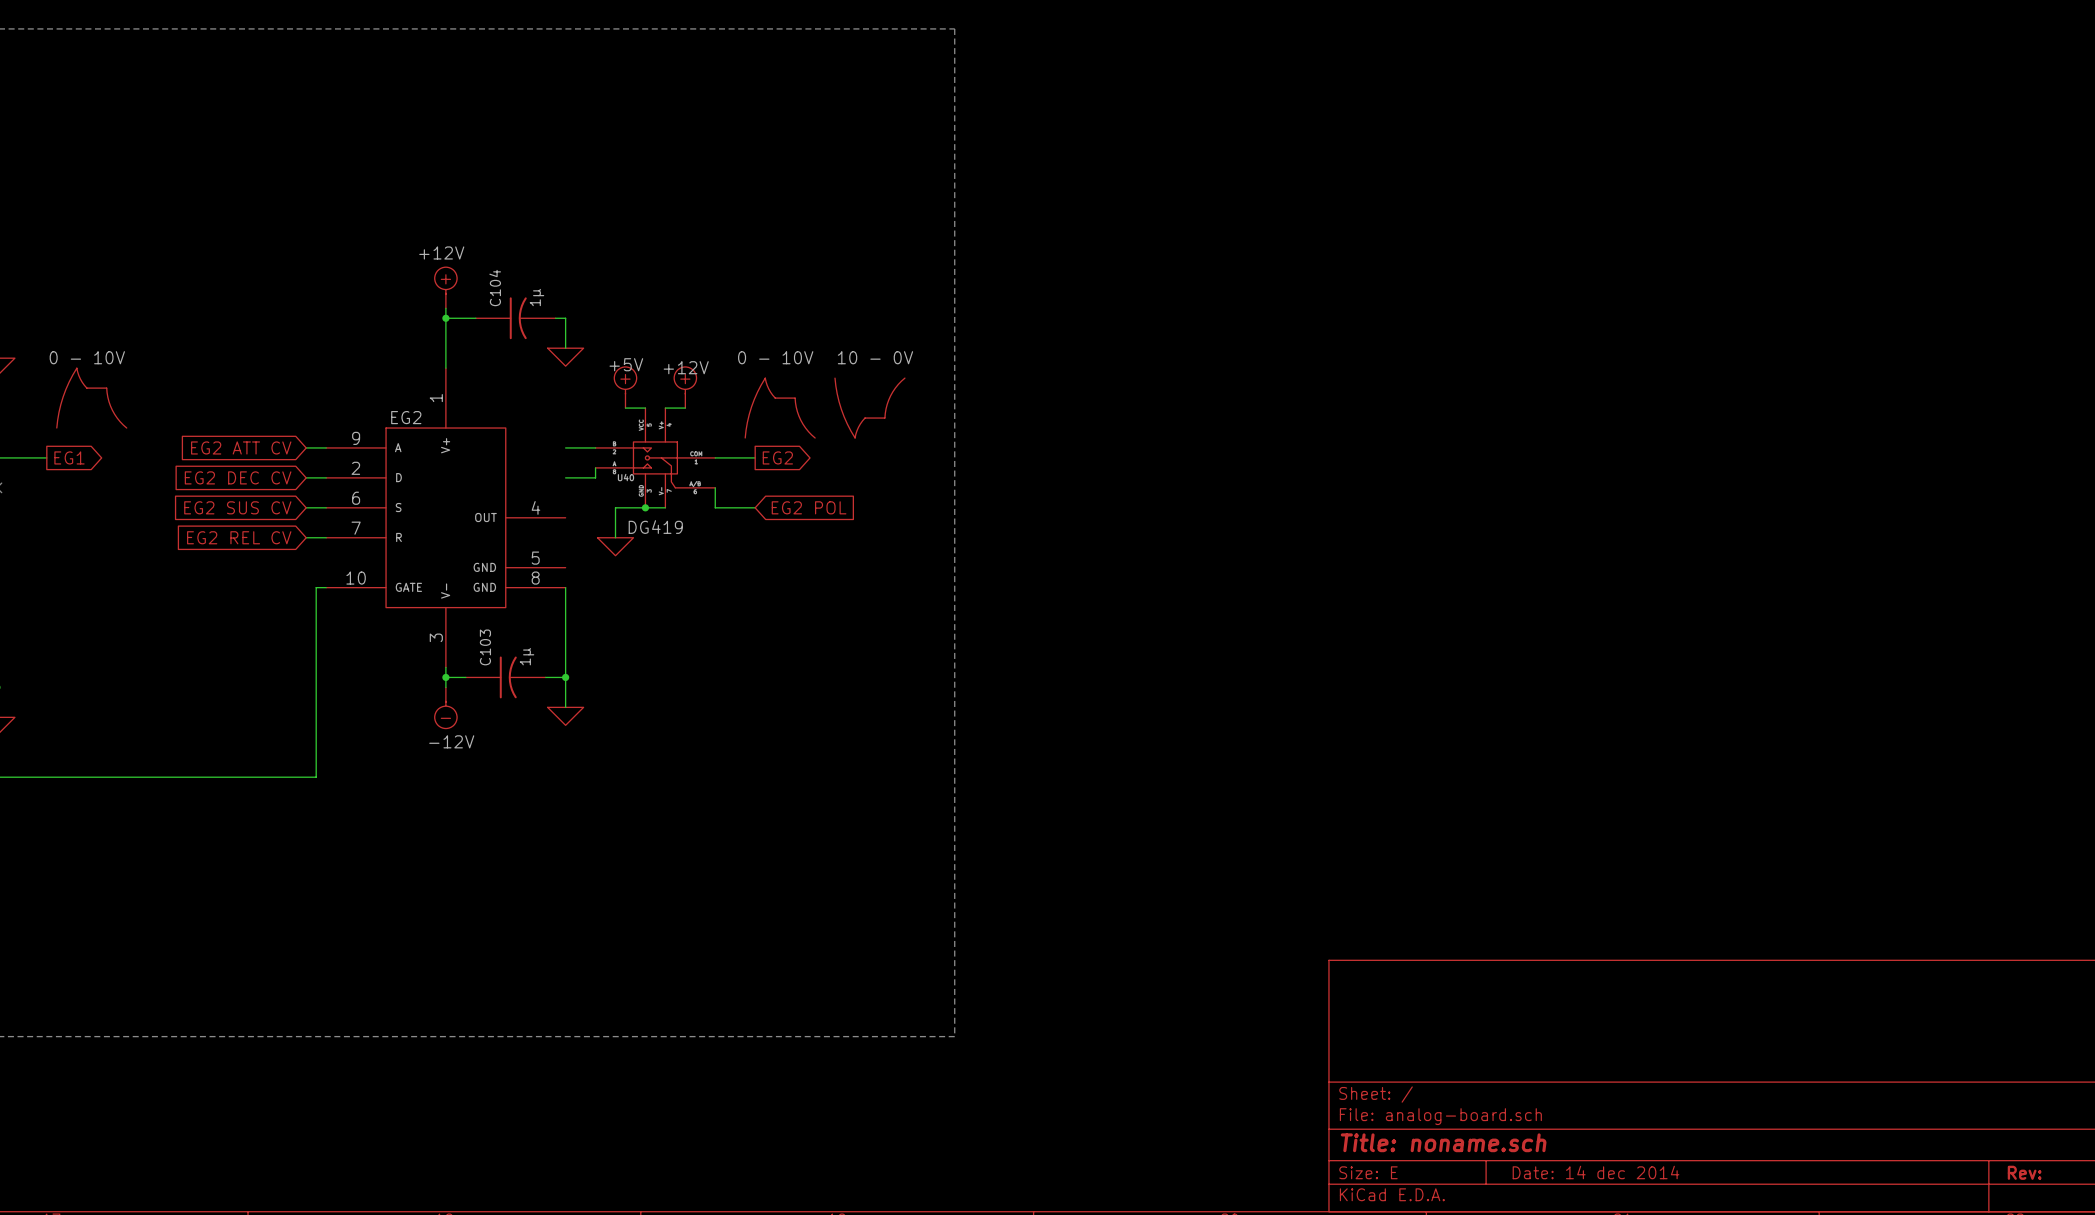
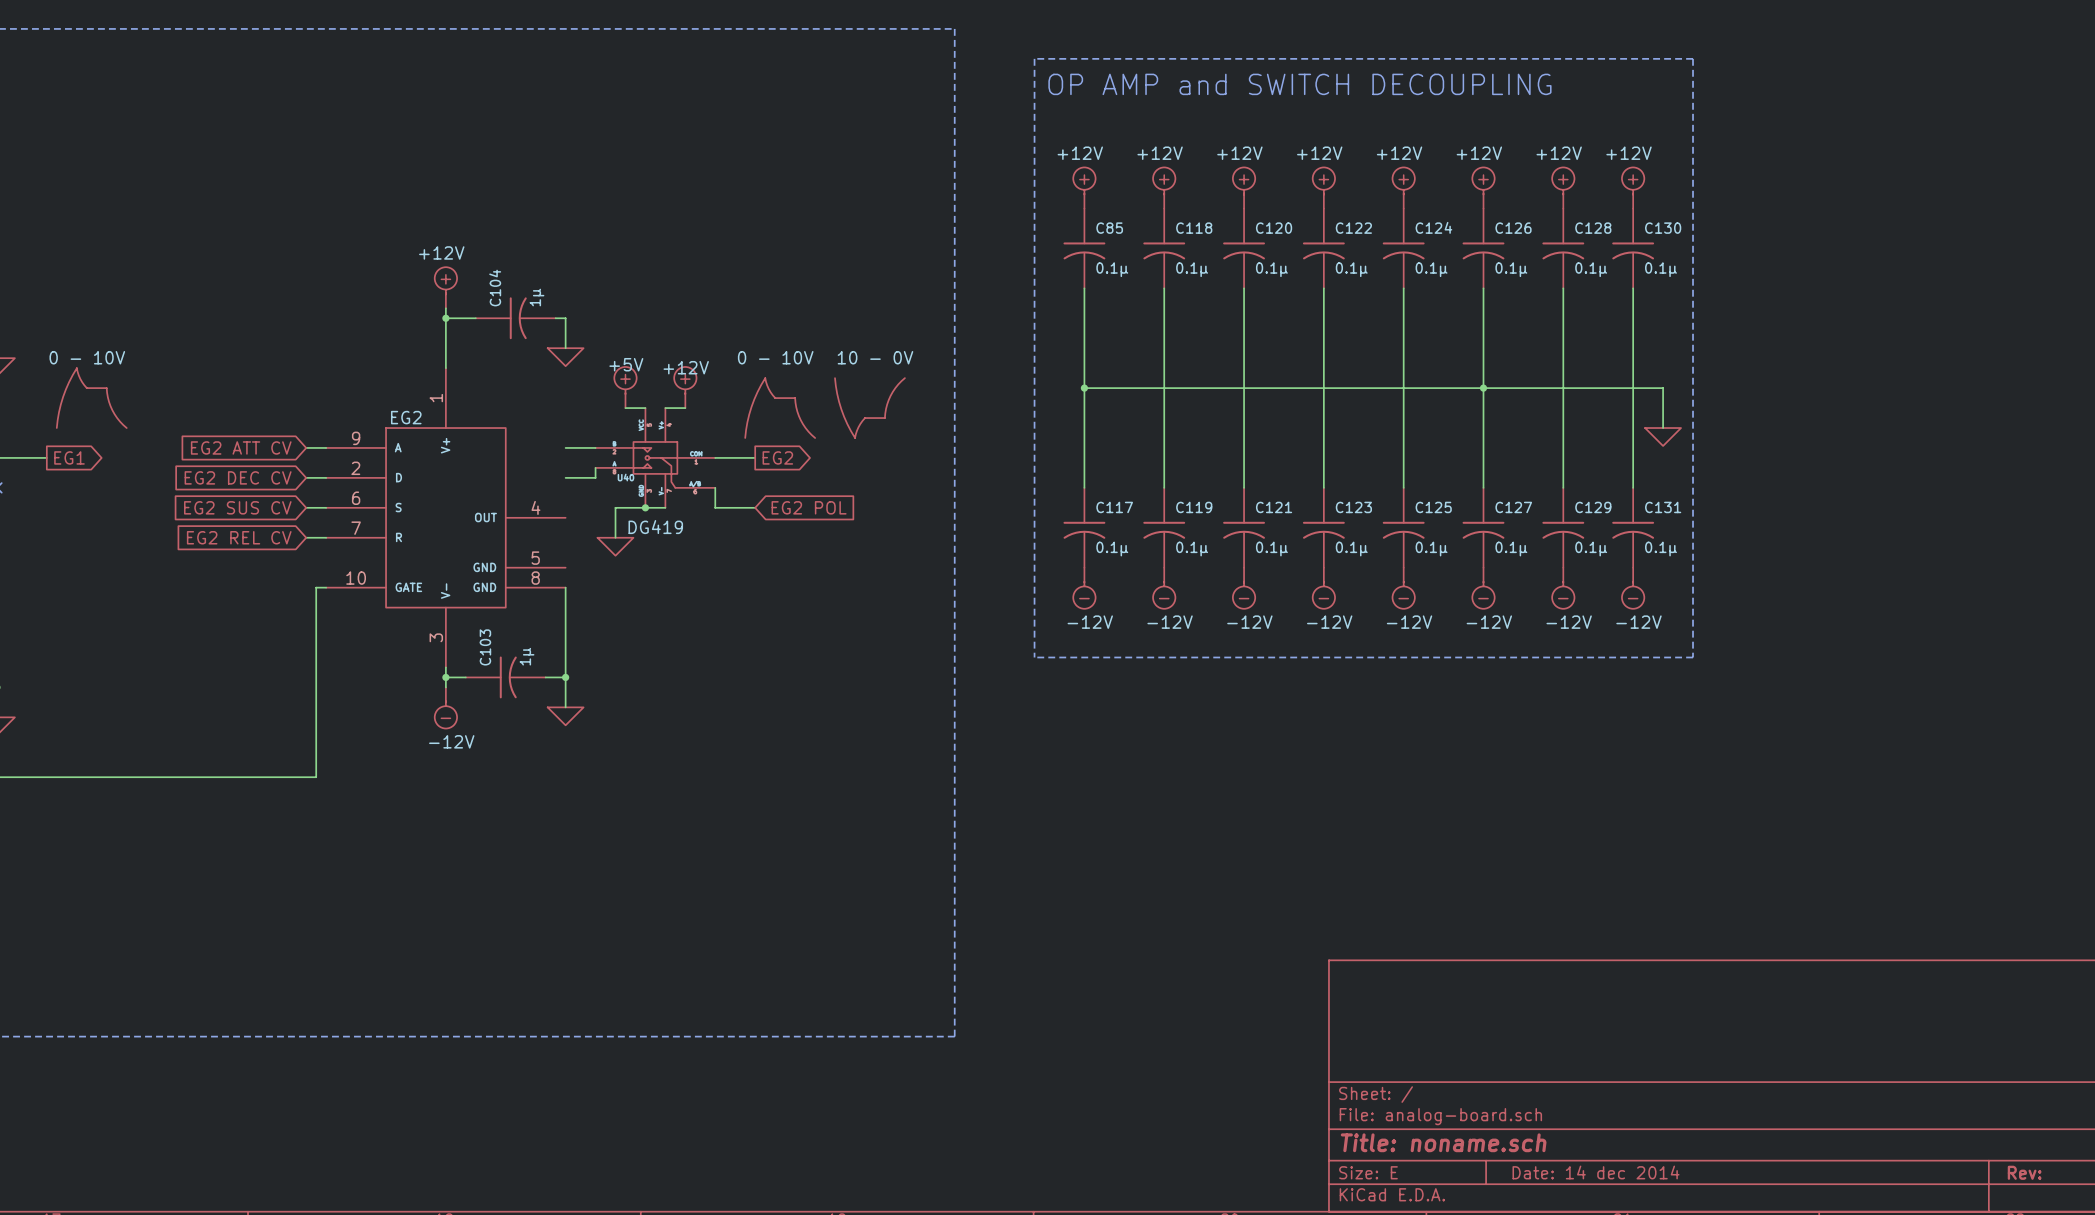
line: none -> (1034, 58) (1034, 657) (1693, 657) (1693, 58) (1034, 58)
text: none -> OP AMP and SWITCH DECOUPLING (1299, 84)
power symbol: none -> +12V (1084, 187)
power symbol: none -> +12V (1164, 187)
power symbol: none -> +12V (1244, 187)
power symbol: none -> +12V (1323, 187)
power symbol: none -> +12V (1403, 187)
power symbol: none -> +12V (1483, 187)
power symbol: none -> +12V (1563, 187)
power symbol: none -> +12V (1633, 187)
C85: none -> 0.1µ (1084, 248)
C118: none -> 0.1µ (1164, 248)
C120: none -> 0.1µ (1244, 248)
C122: none -> 0.1µ (1323, 248)
C124: none -> 0.1µ (1403, 248)
C126: none -> 0.1µ (1483, 248)
C128: none -> 0.1µ (1563, 248)
C130: none -> 0.1µ (1633, 248)
wire: none -> (1084, 288) (1084, 487)
wire: none -> (1164, 288) (1164, 487)
wire: none -> (1244, 288) (1244, 487)
wire: none -> (1323, 288) (1323, 487)
wire: none -> (1403, 288) (1403, 487)
wire: none -> (1483, 288) (1483, 487)
wire: none -> (1563, 288) (1563, 487)
wire: none -> (1633, 288) (1633, 487)
wire: none -> (1084, 388) (1663, 388) (1663, 428)
junction: none -> (1084, 388)
junction: none -> (1483, 388)
power symbol: none -> (1663, 436)
C117: none -> 0.1µ (1084, 527)
C119: none -> 0.1µ (1164, 527)
C121: none -> 0.1µ (1244, 527)
C123: none -> 0.1µ (1323, 527)
C125: none -> 0.1µ (1403, 527)
C127: none -> 0.1µ (1483, 527)
C129: none -> 0.1µ (1563, 527)
C131: none -> 0.1µ (1633, 527)
power symbol: none -> -12V (1084, 588)
power symbol: none -> -12V (1164, 588)
power symbol: none -> -12V (1244, 588)
power symbol: none -> -12V (1323, 588)
power symbol: none -> -12V (1403, 588)
power symbol: none -> -12V (1483, 588)
power symbol: none -> -12V (1563, 588)
power symbol: none -> -12V (1633, 588)

